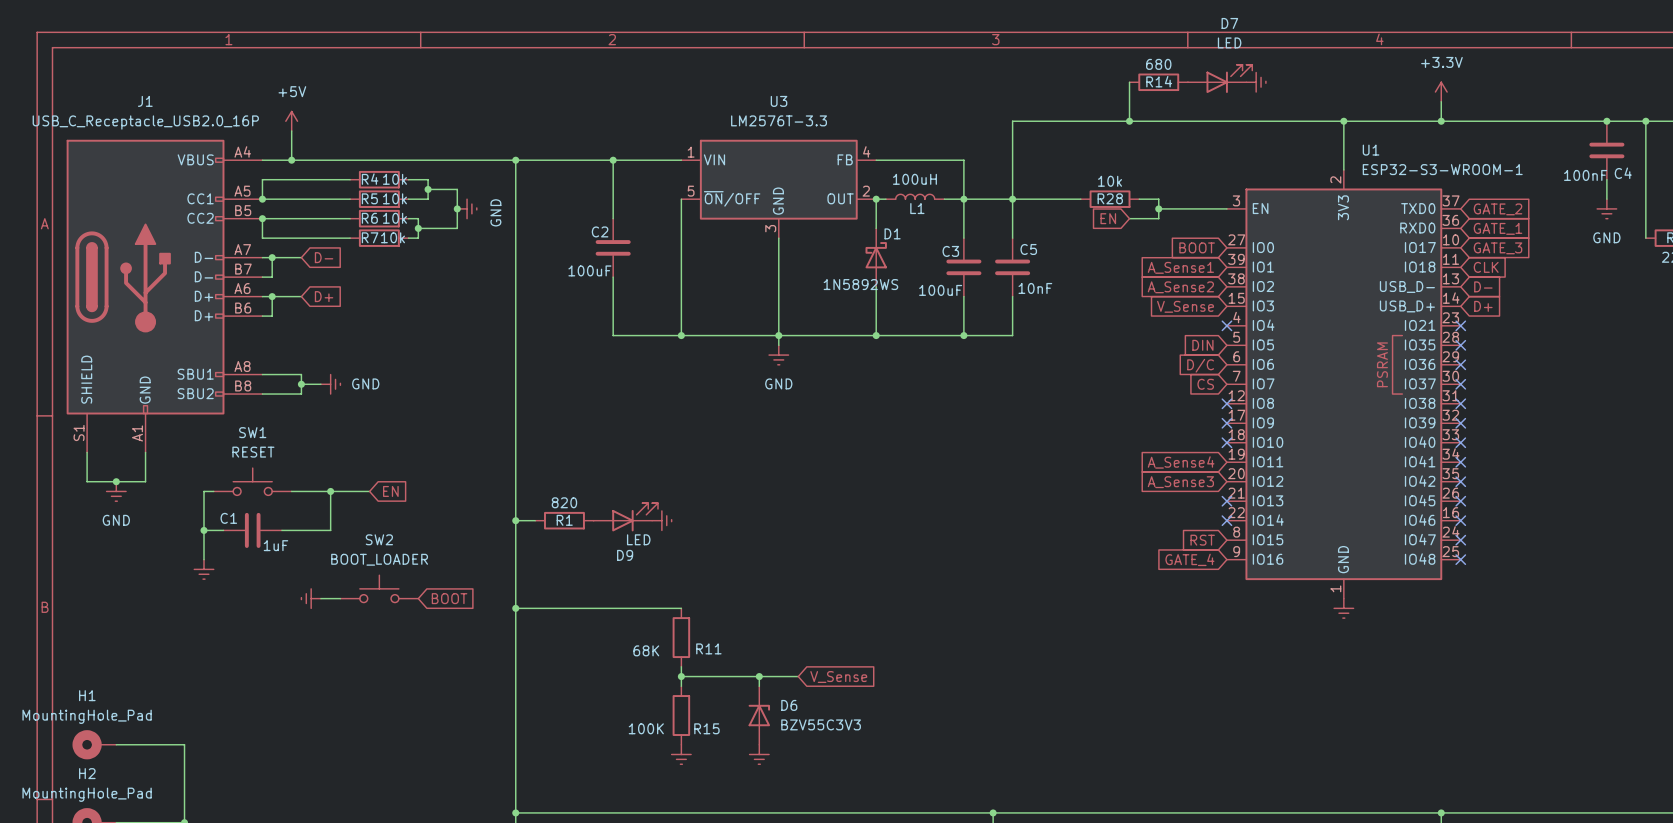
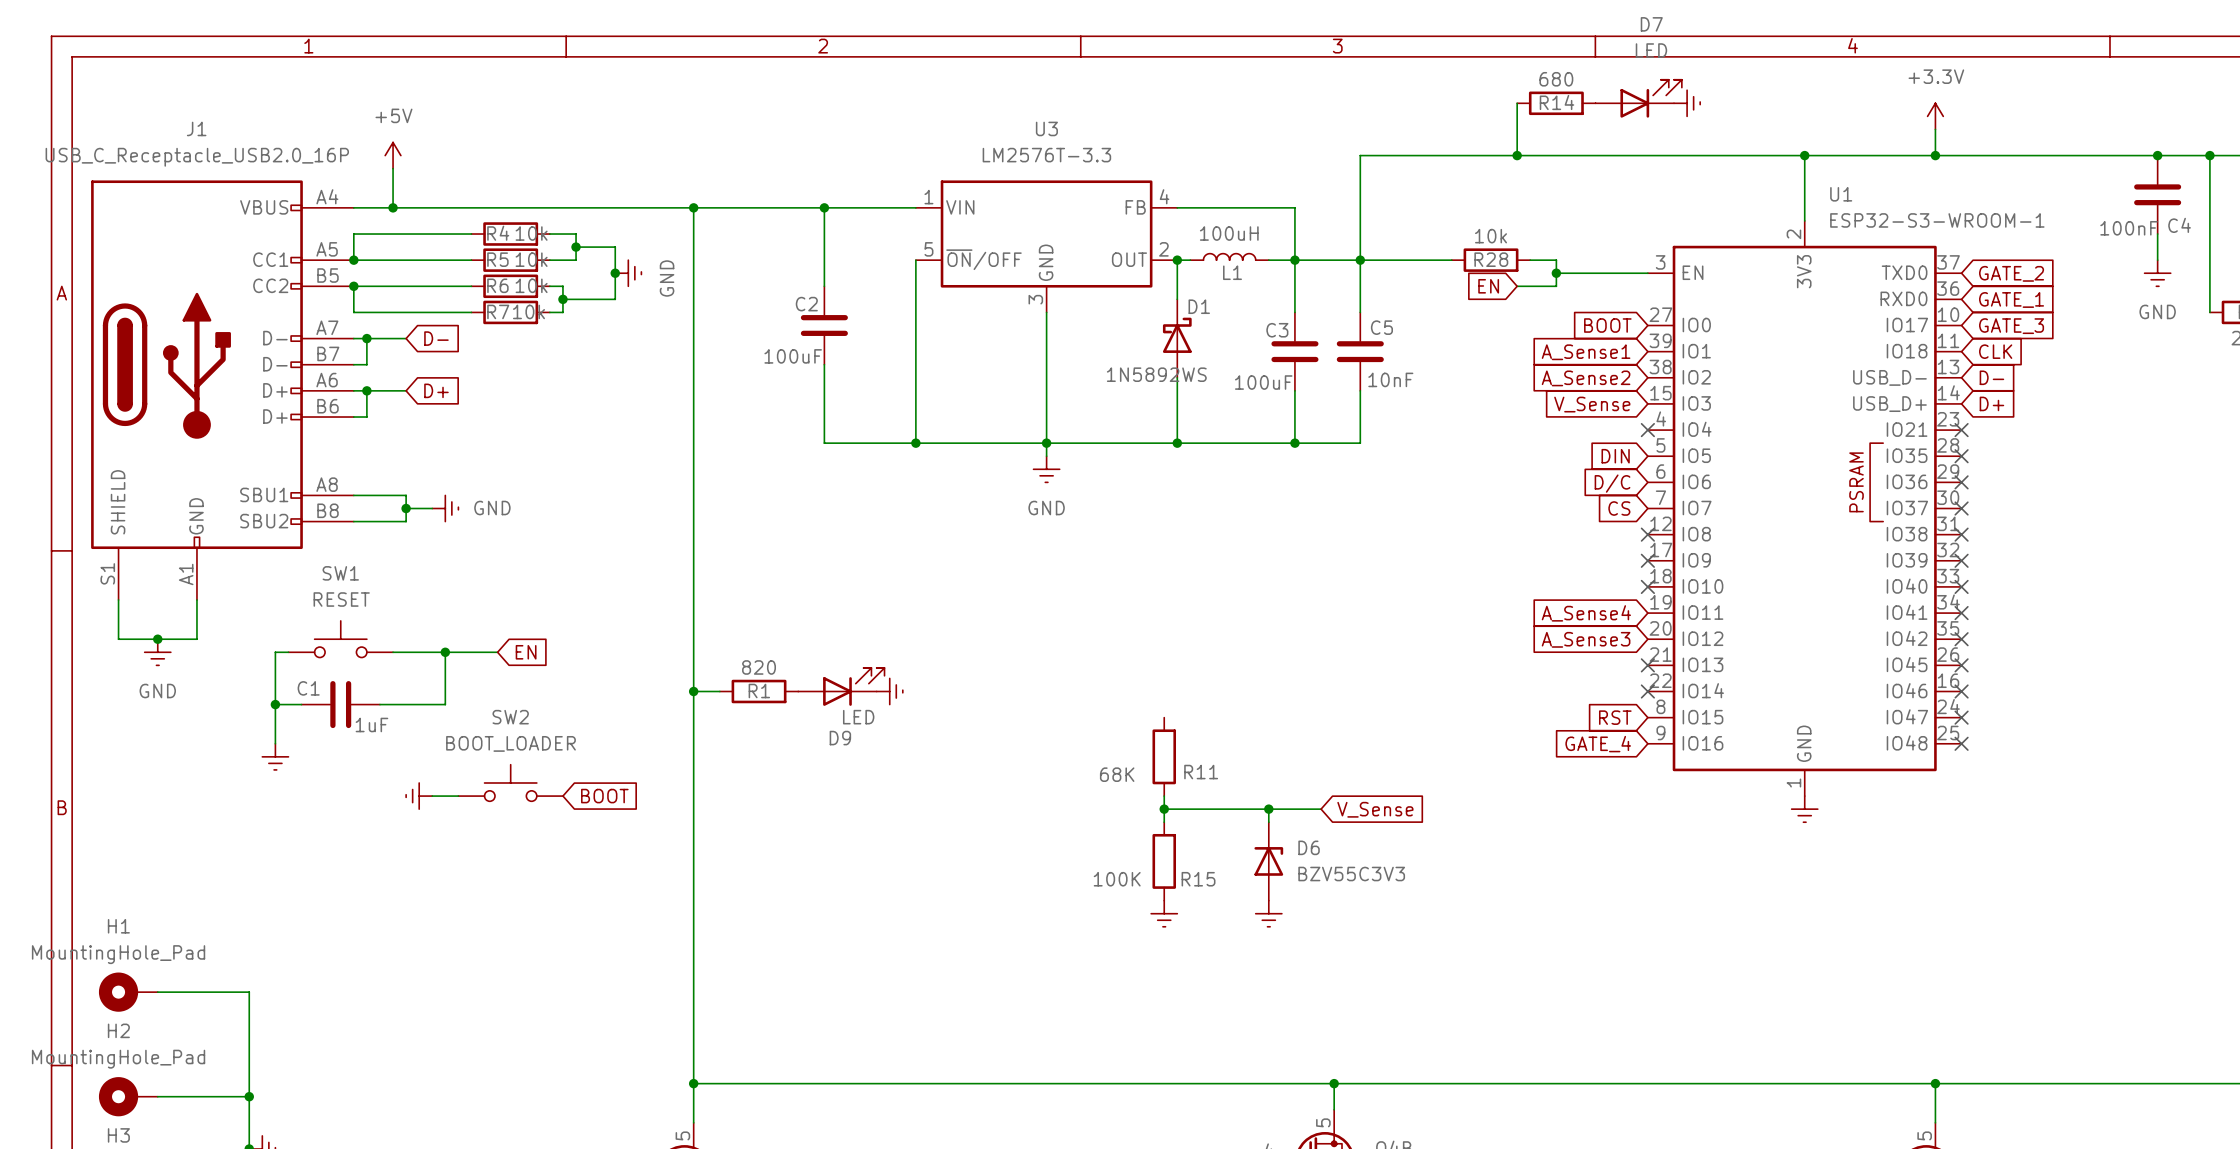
wire: none -> (1164, 796) (1164, 822)
wire: (515, 608) (681, 608) -> none
junction: (515, 608) -> none
wire: none -> (1164, 809) (1321, 809)
junction: none -> (1164, 809)
wire: none -> (1268, 809) (1268, 822)
junction: none -> (1268, 809)
global label: none -> V_Sense (1375, 809)
R11 position: (681, 637) -> (1164, 756)
wire: (681, 666) (681, 686) -> none
wire: (681, 676) (798, 676) -> none
junction: (681, 676) -> none
wire: (759, 676) (759, 686) -> none
junction: (759, 676) -> none
global label: V_Sense (838, 677) -> none
power symbol: none -> (1164, 913)
power symbol: none -> (1268, 913)
R15 position: (681, 715) -> (1164, 861)
D6 position: (759, 715) -> (1268, 861)
power symbol: (681, 754) -> none
power symbol: (759, 754) -> none

